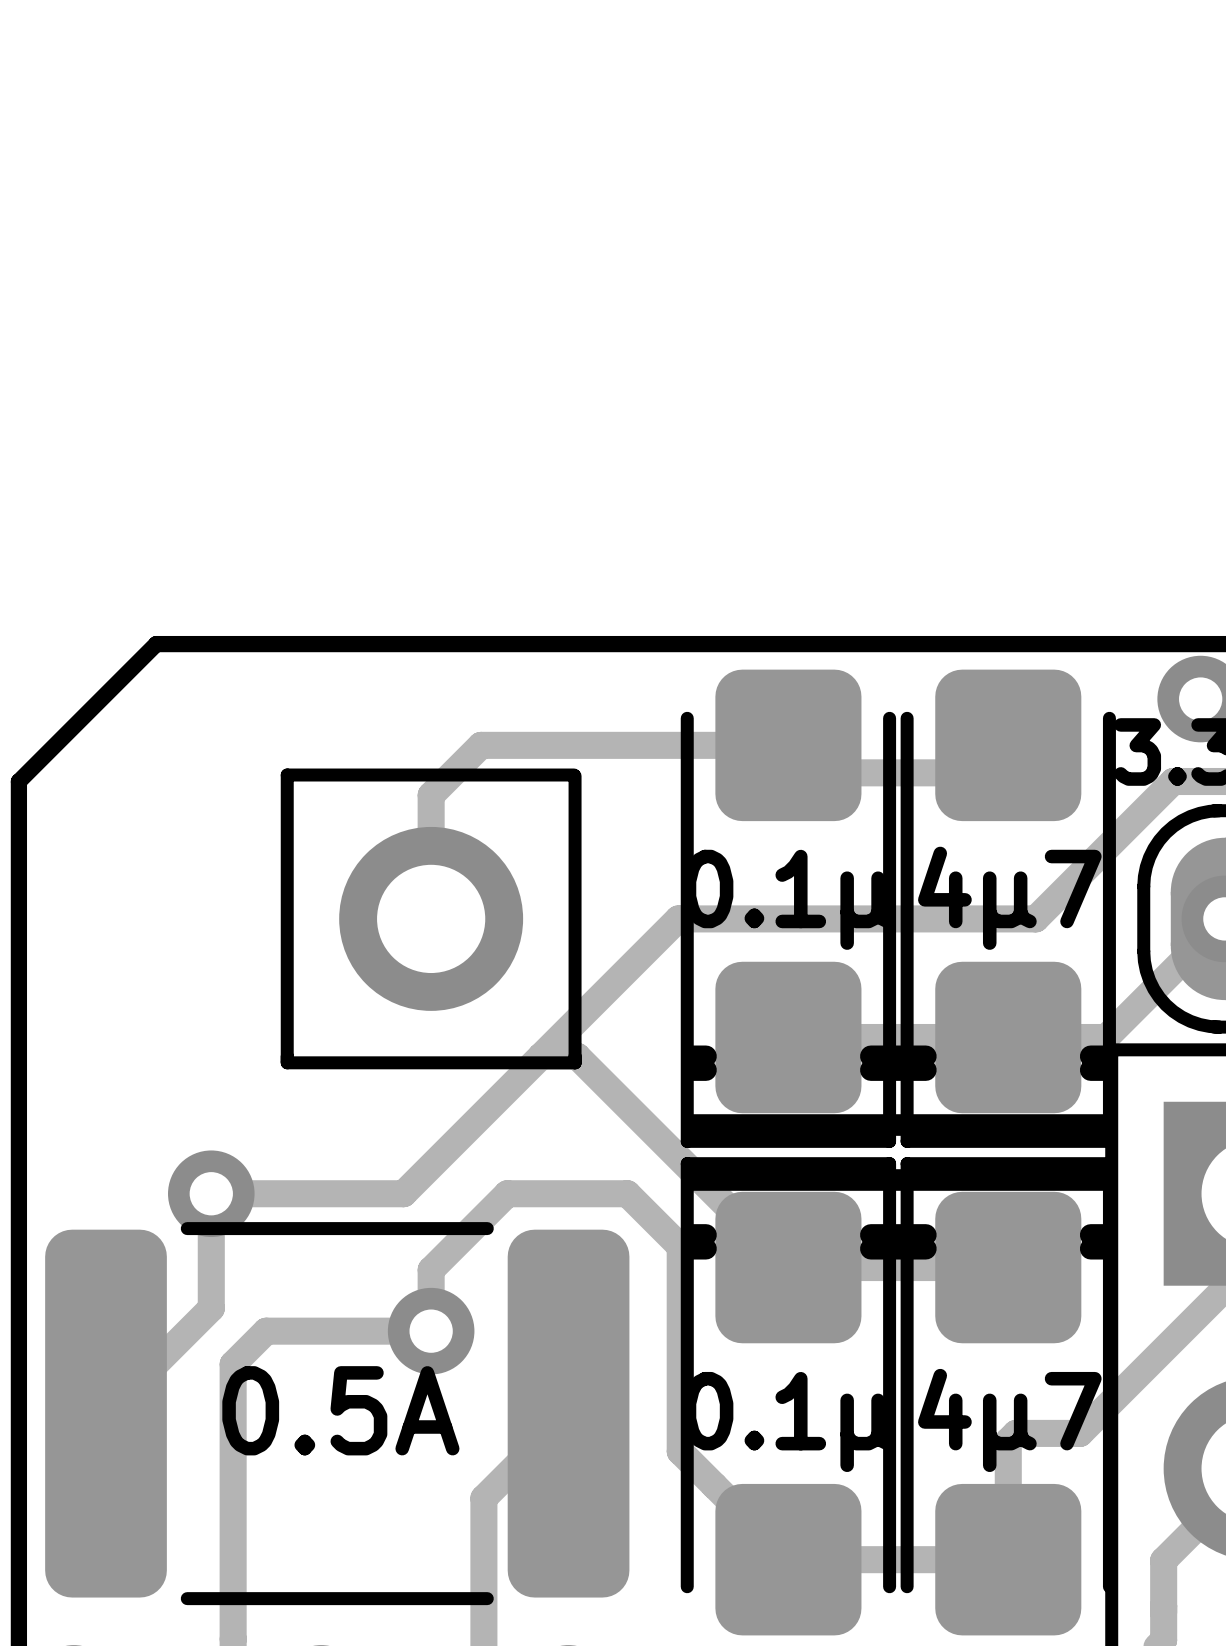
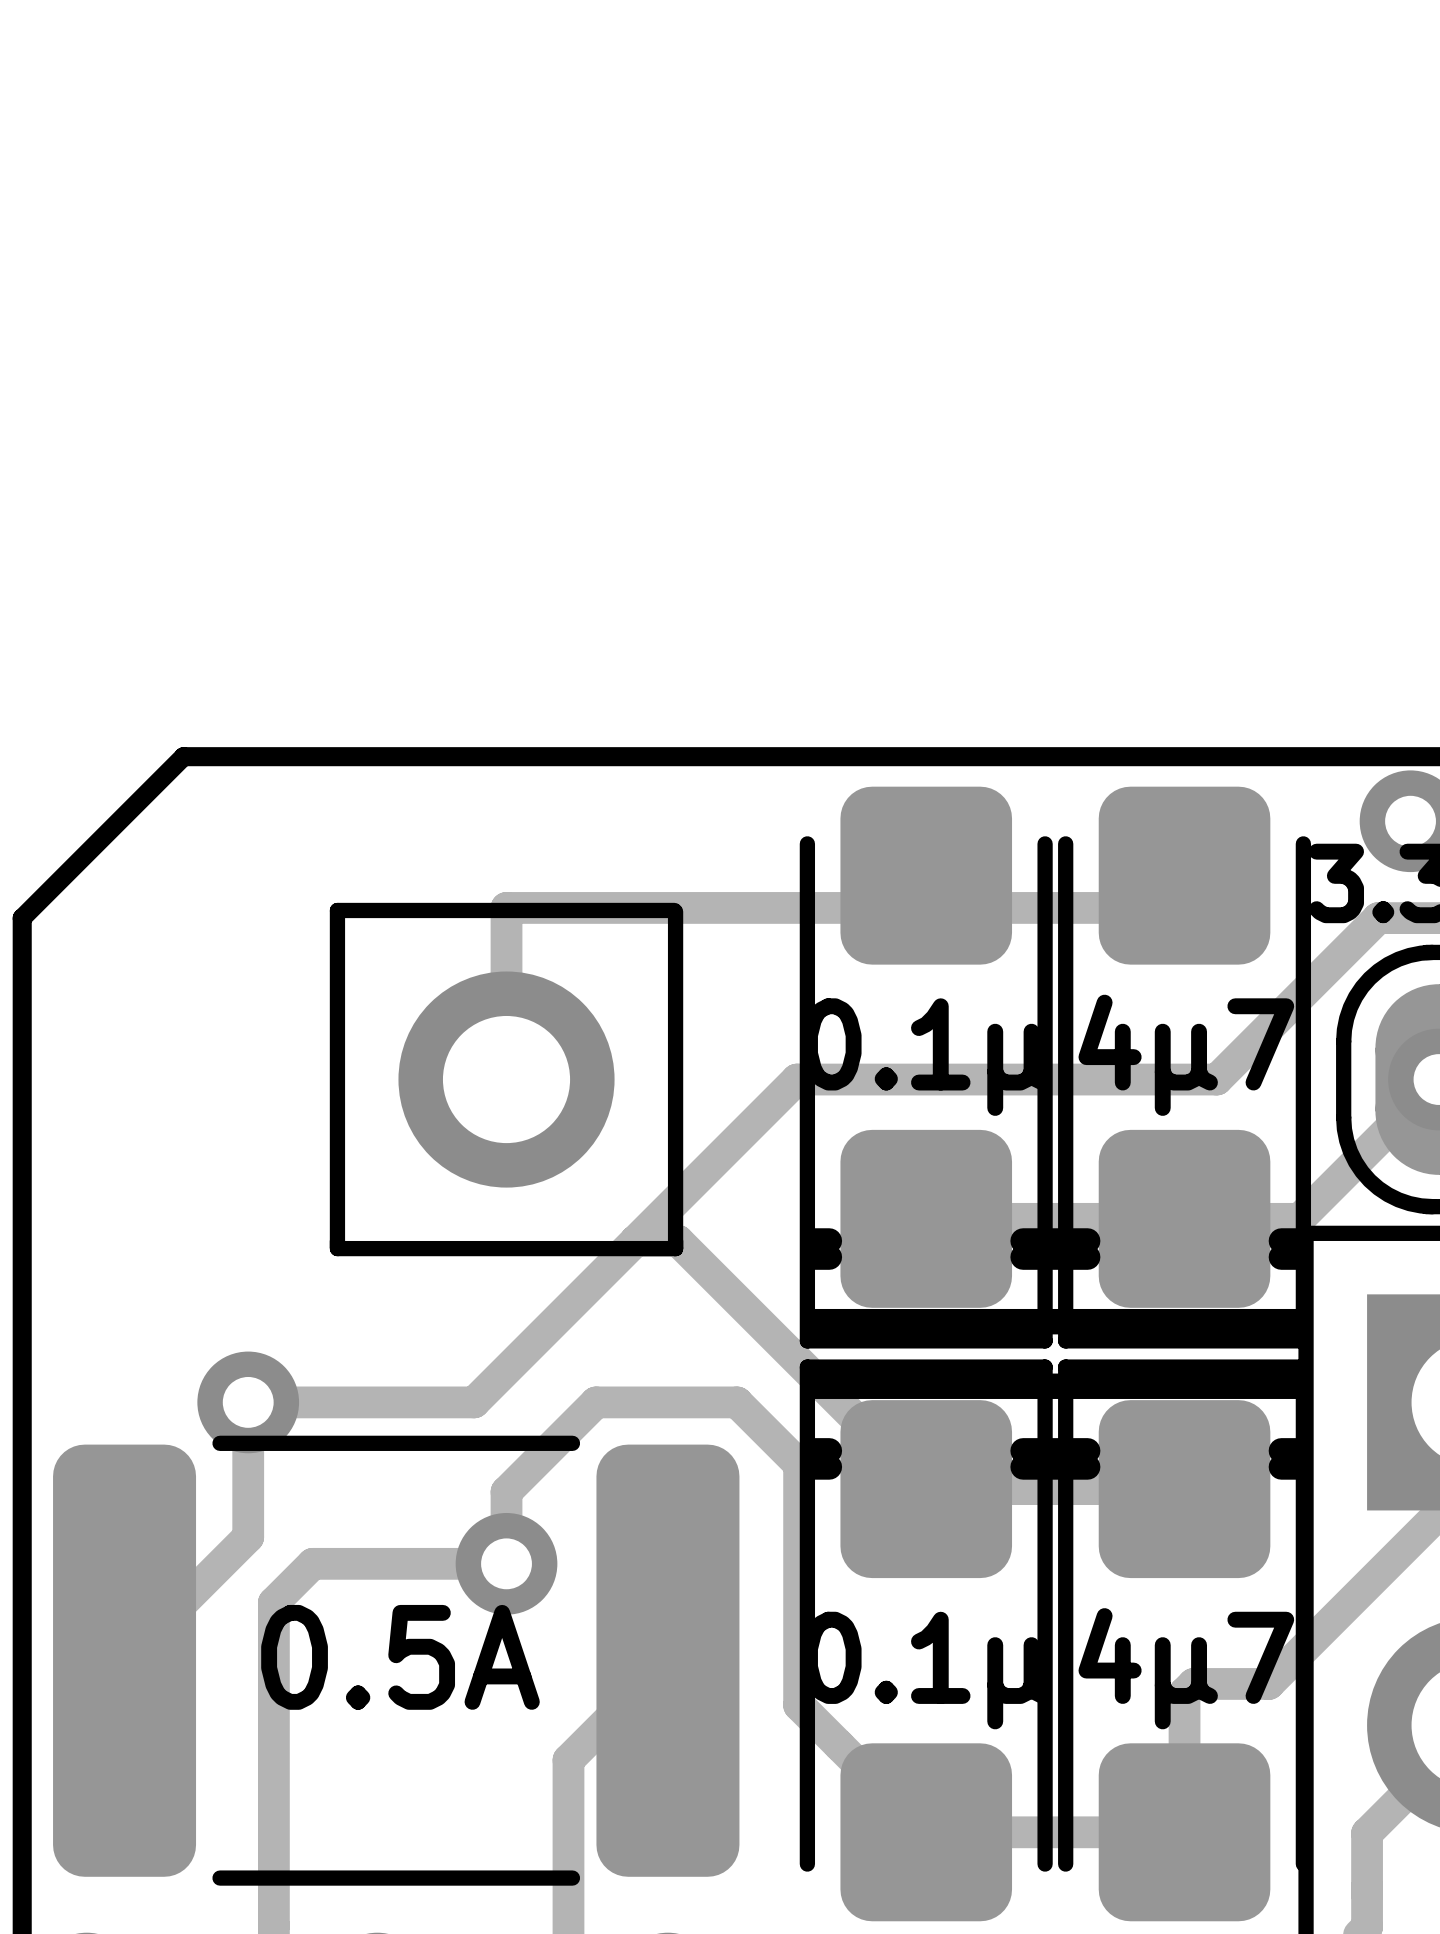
track: (788, 745) (481, 745) (431, 795) -> (893, 907) (506, 907) (506, 934)

